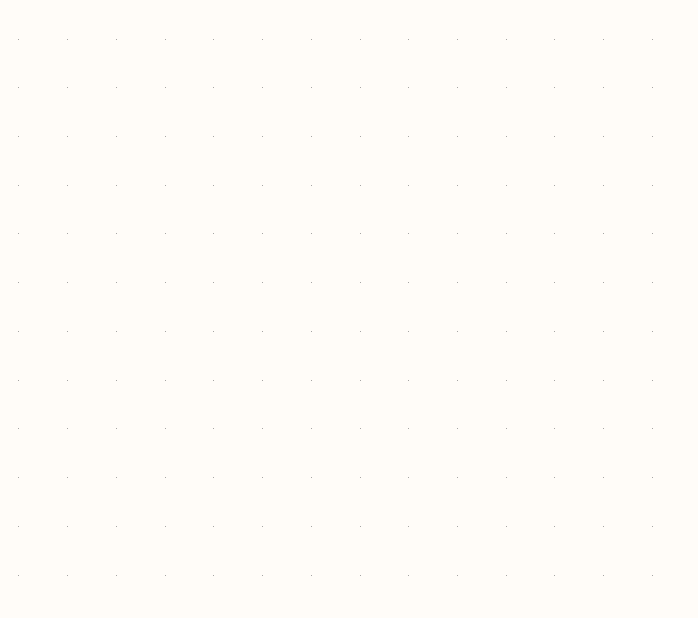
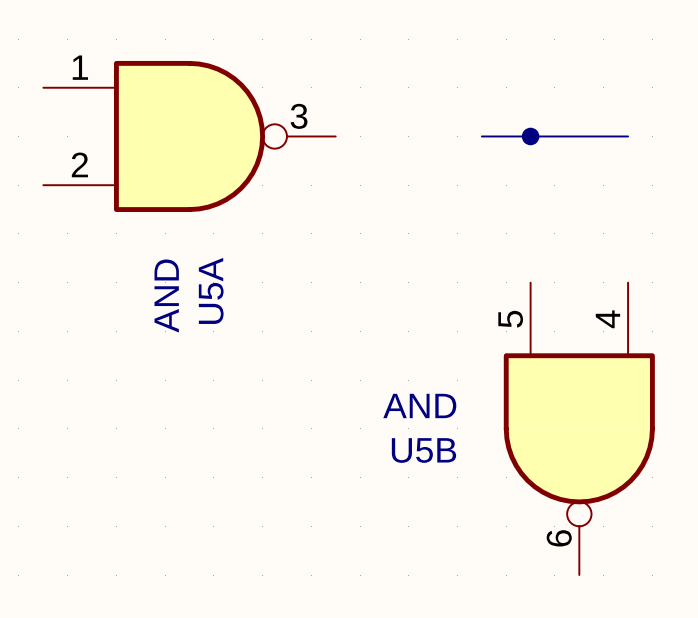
U5A: none -> AND (189, 136)
wire: none -> (481, 136) (628, 136)
junction: none -> (530, 136)
U5B: none -> AND (579, 428)

